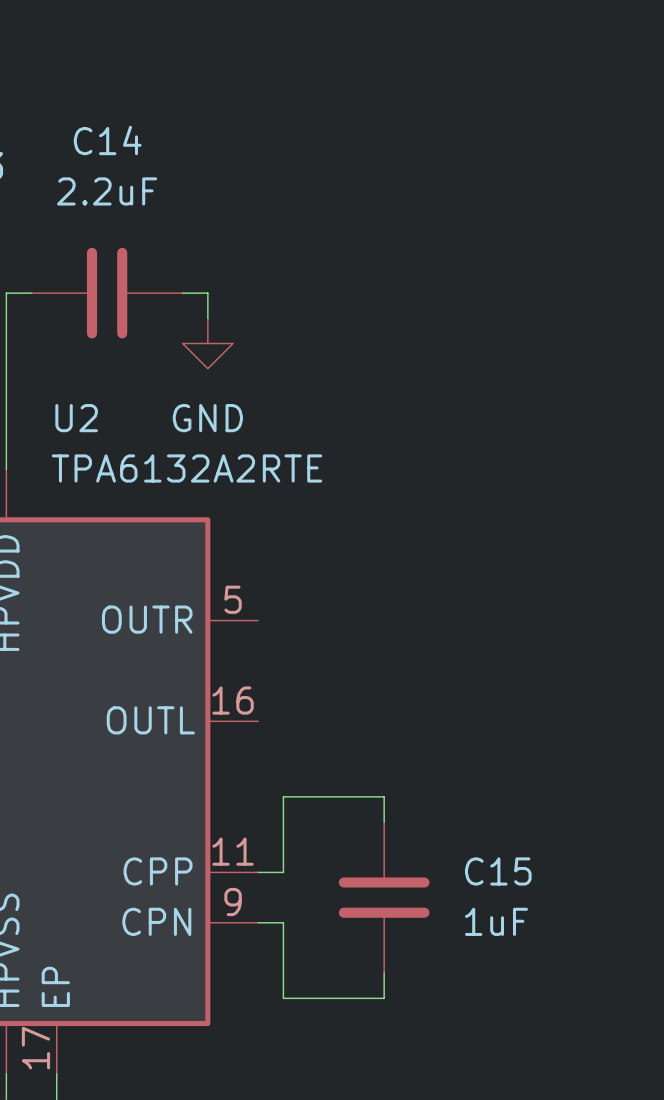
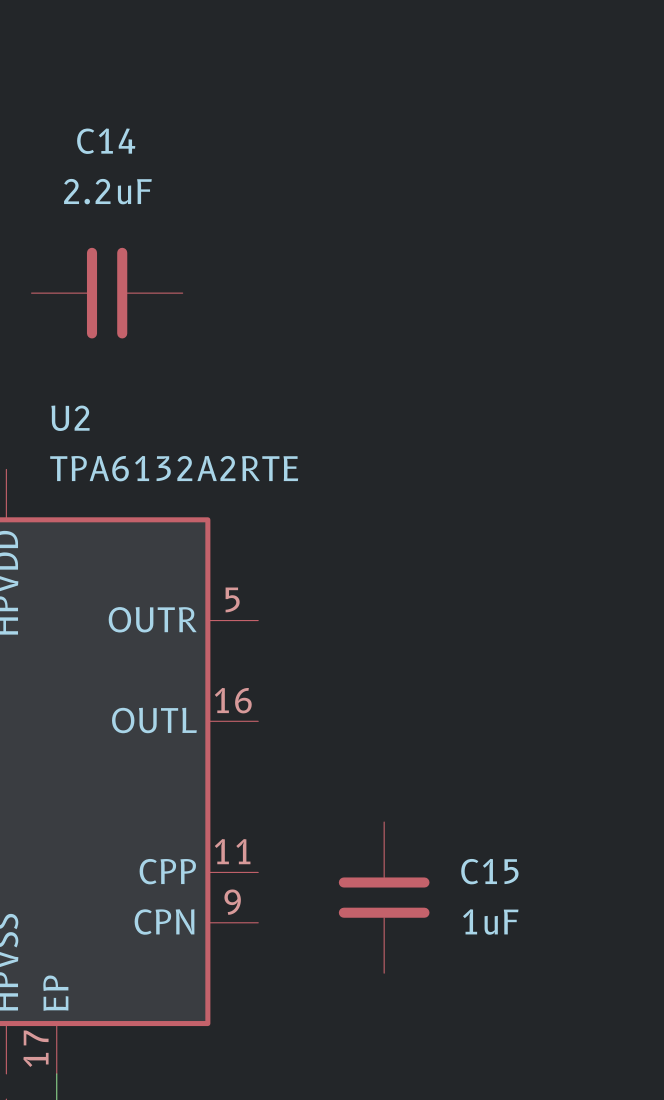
wire: (31, 293) (6, 293) (6, 469) -> none
wire: (182, 293) (207, 293) (207, 318) -> none
power symbol: GND (207, 343) -> none
wire: (384, 822) (384, 796) (283, 796) (283, 872) (258, 872) -> none
wire: (258, 922) (283, 922) (283, 998) (384, 998) (384, 973) -> none
wire: (6, 1073) (6, 1099) -> none

